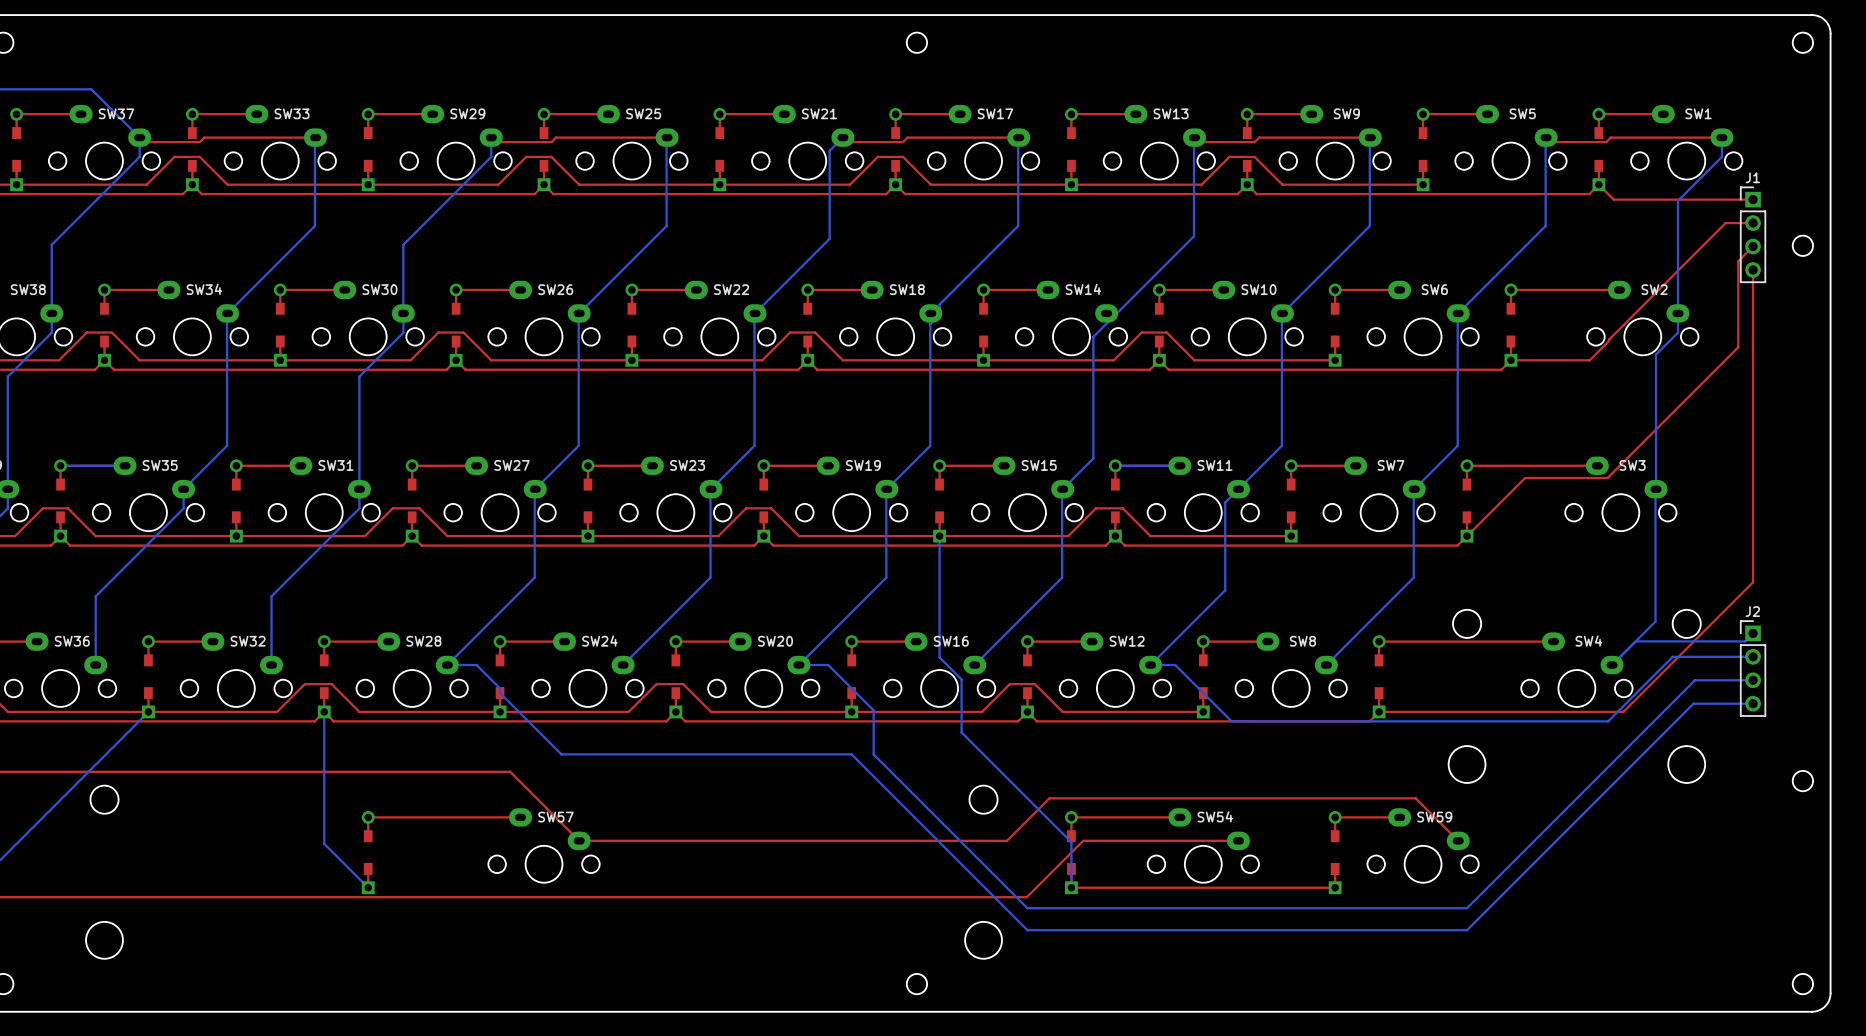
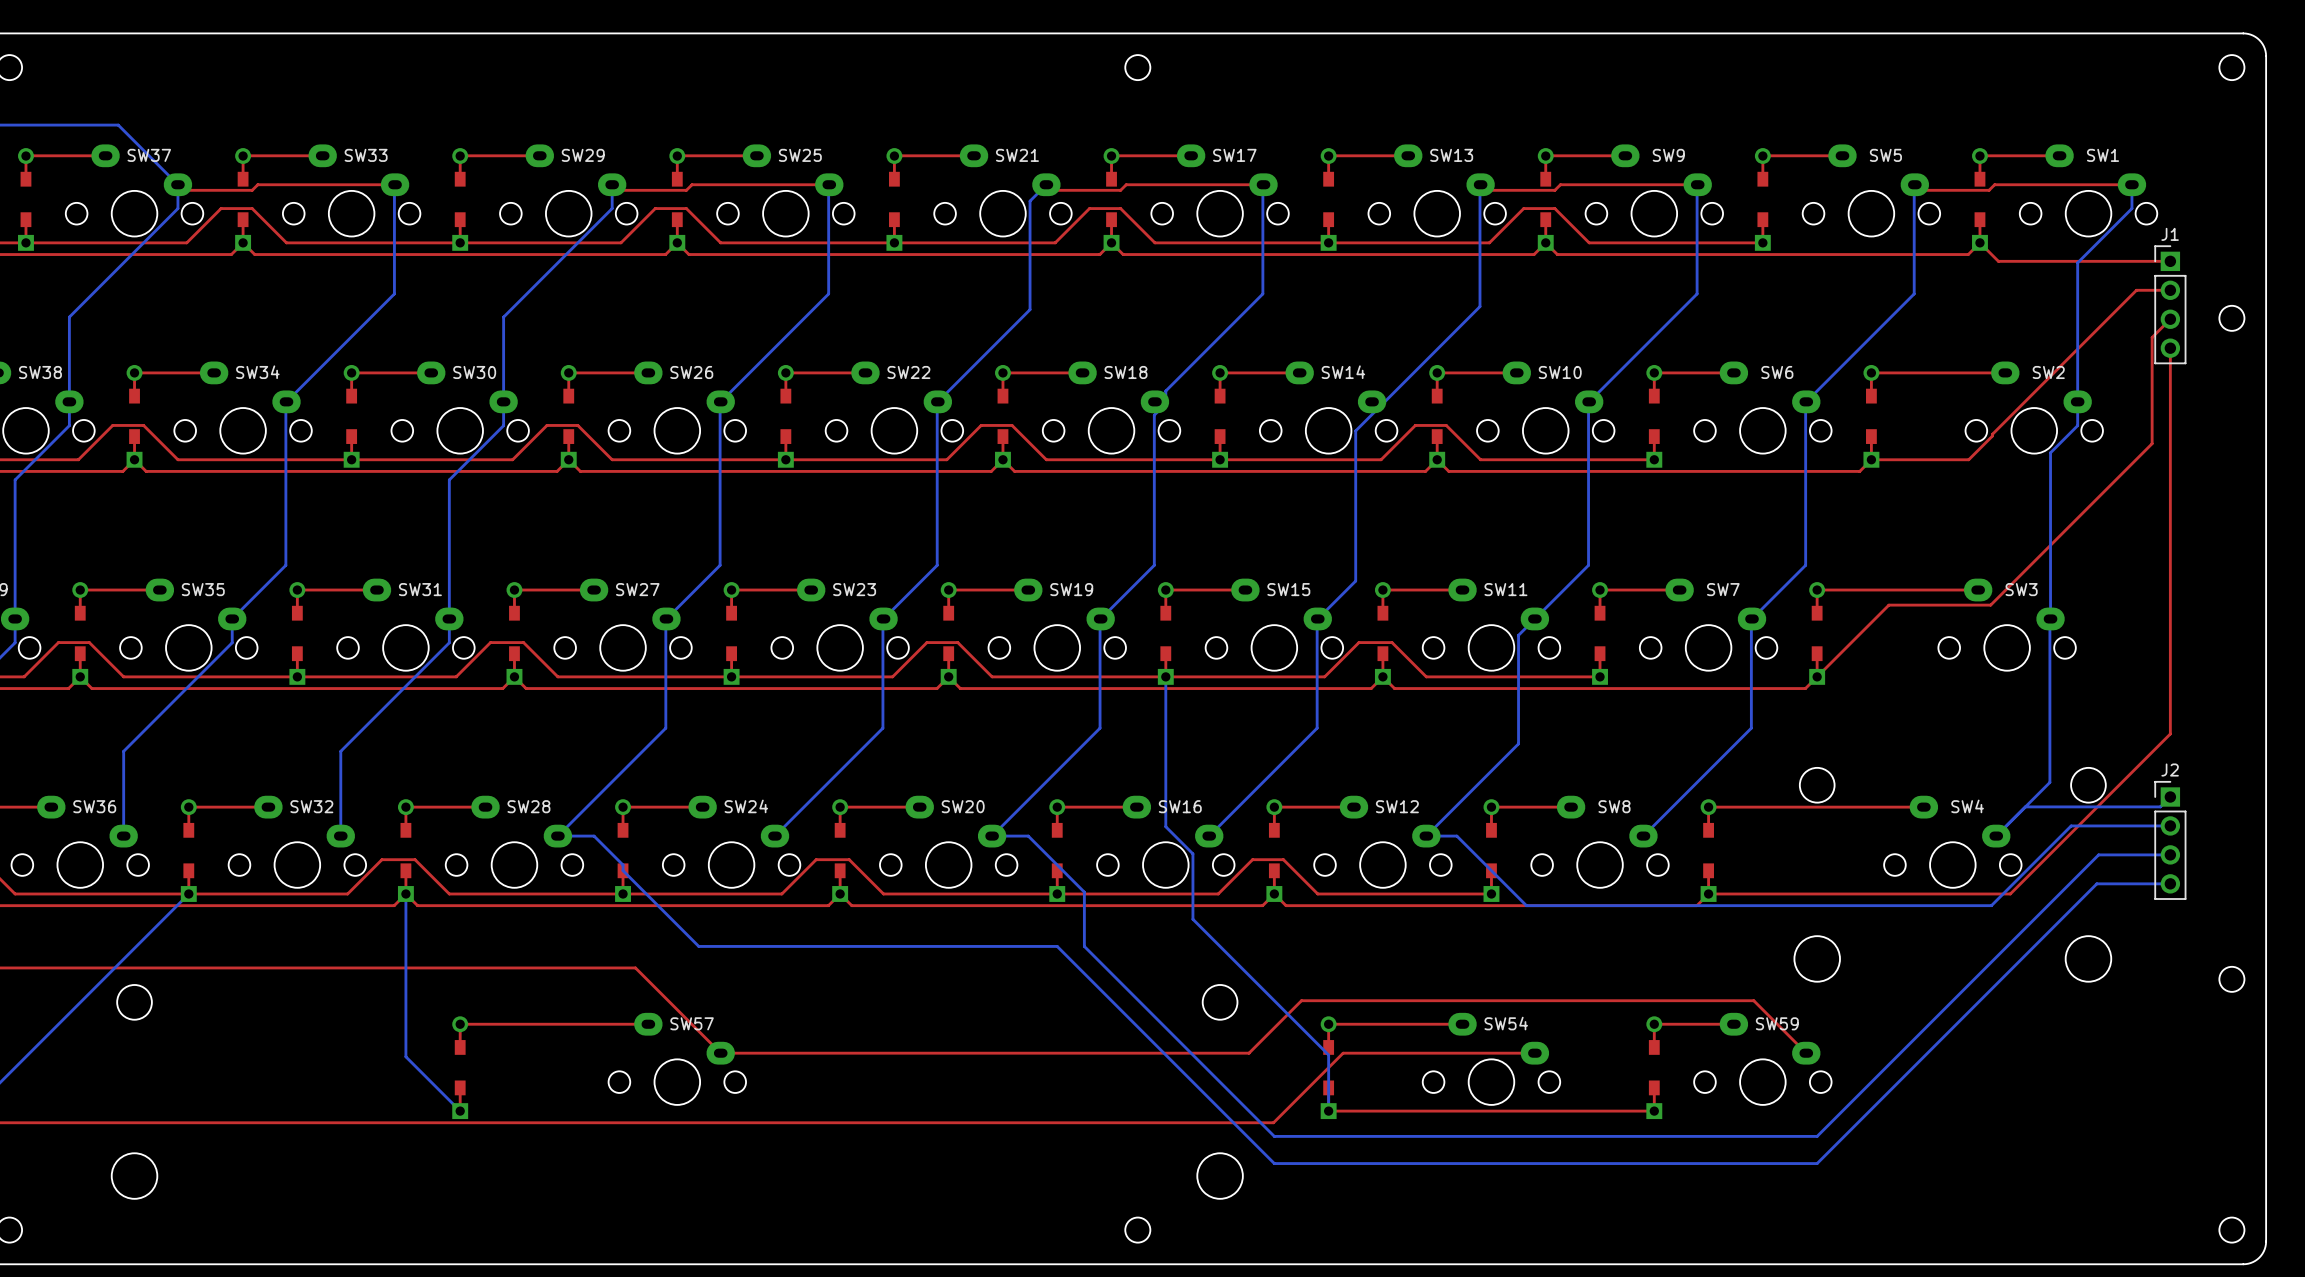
bottom track: (125, 465) (60, 465) -> none
bottom track: (1179, 465) (1115, 465) -> none

